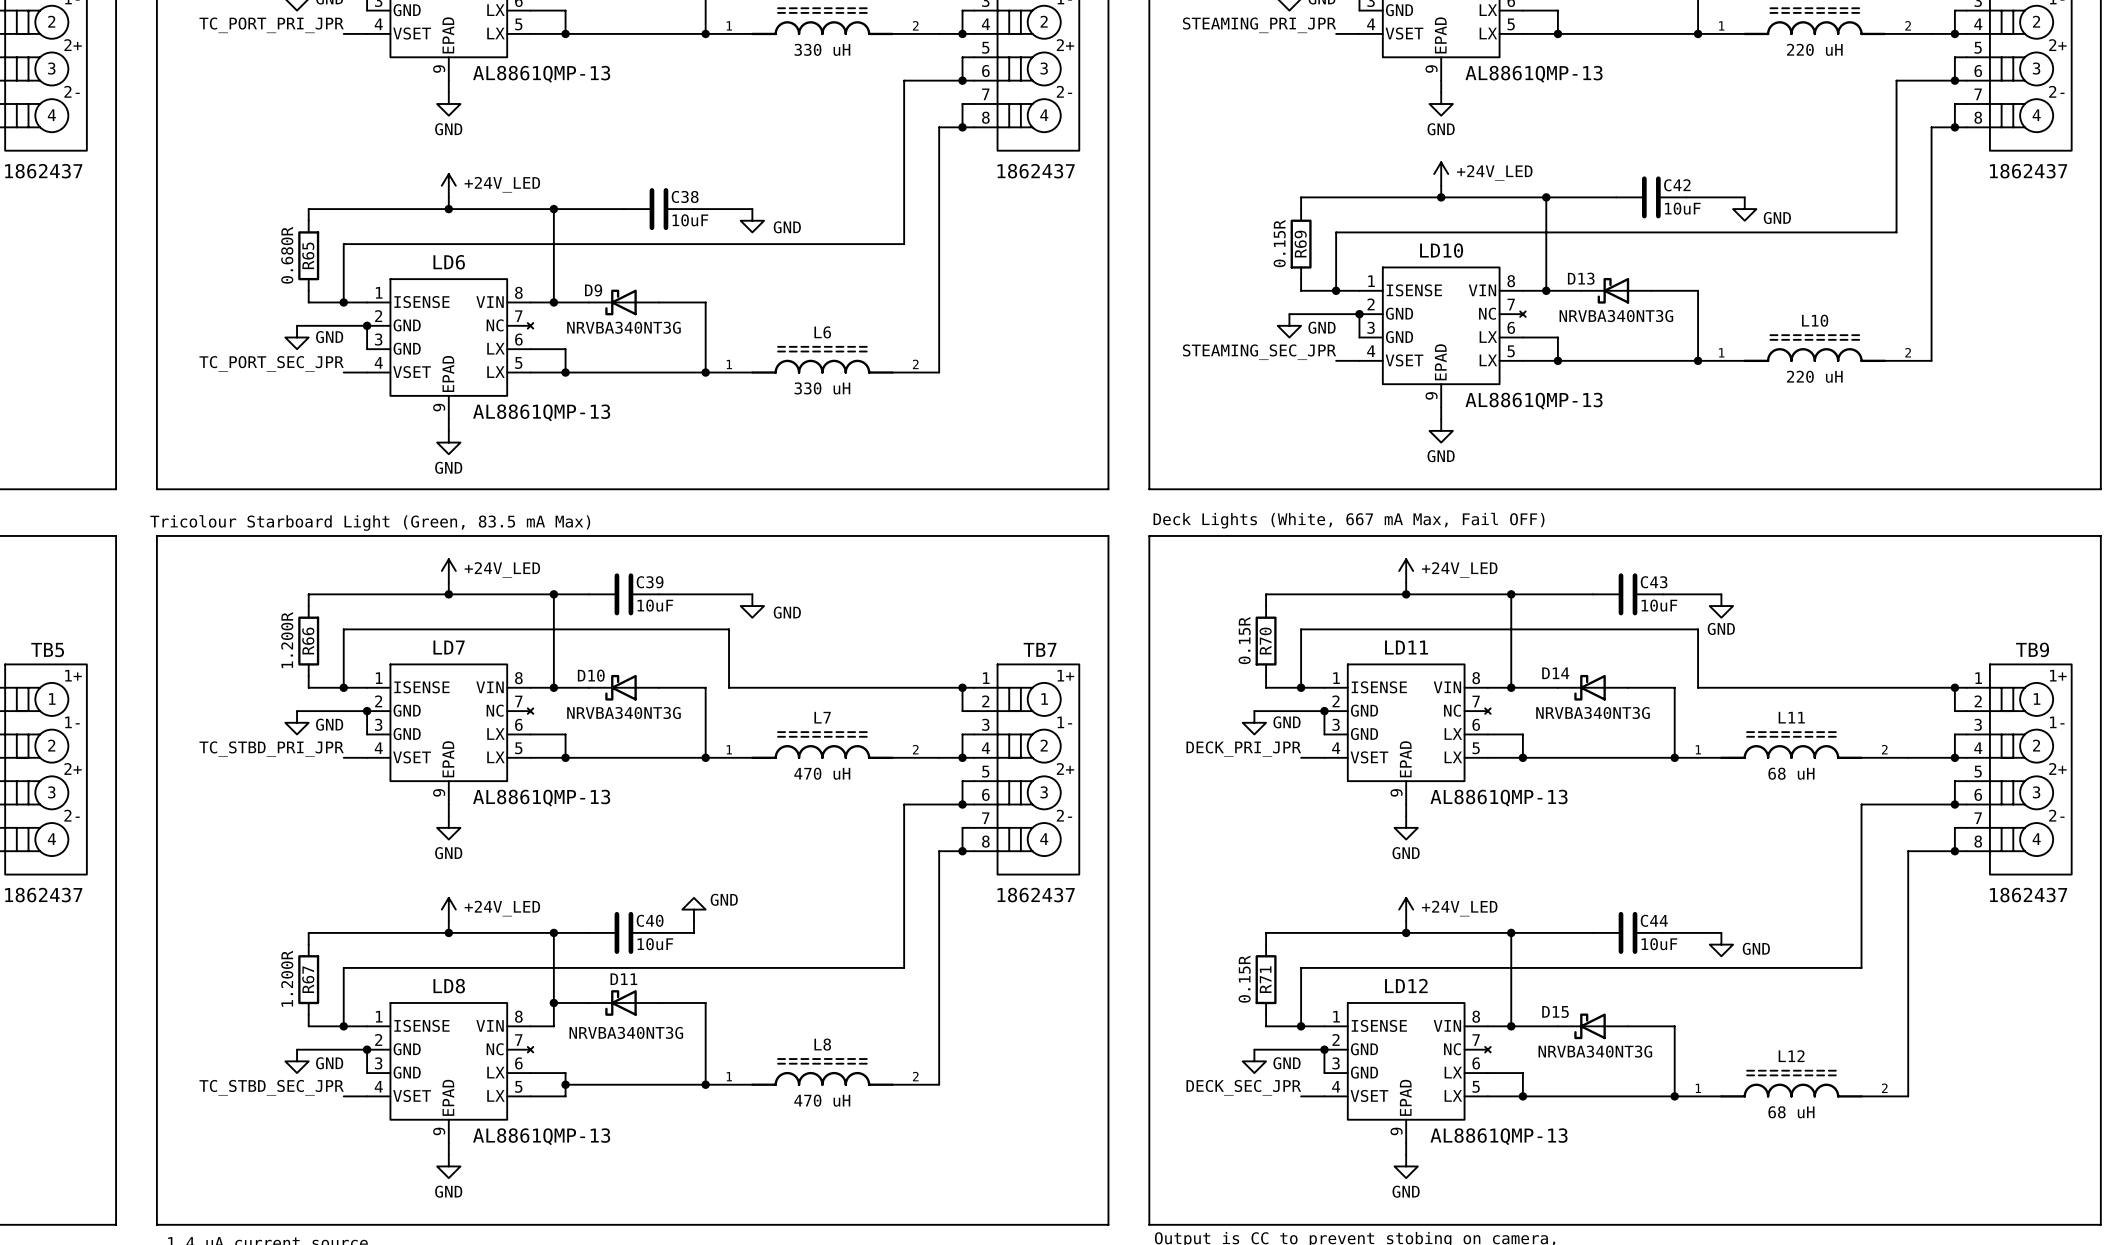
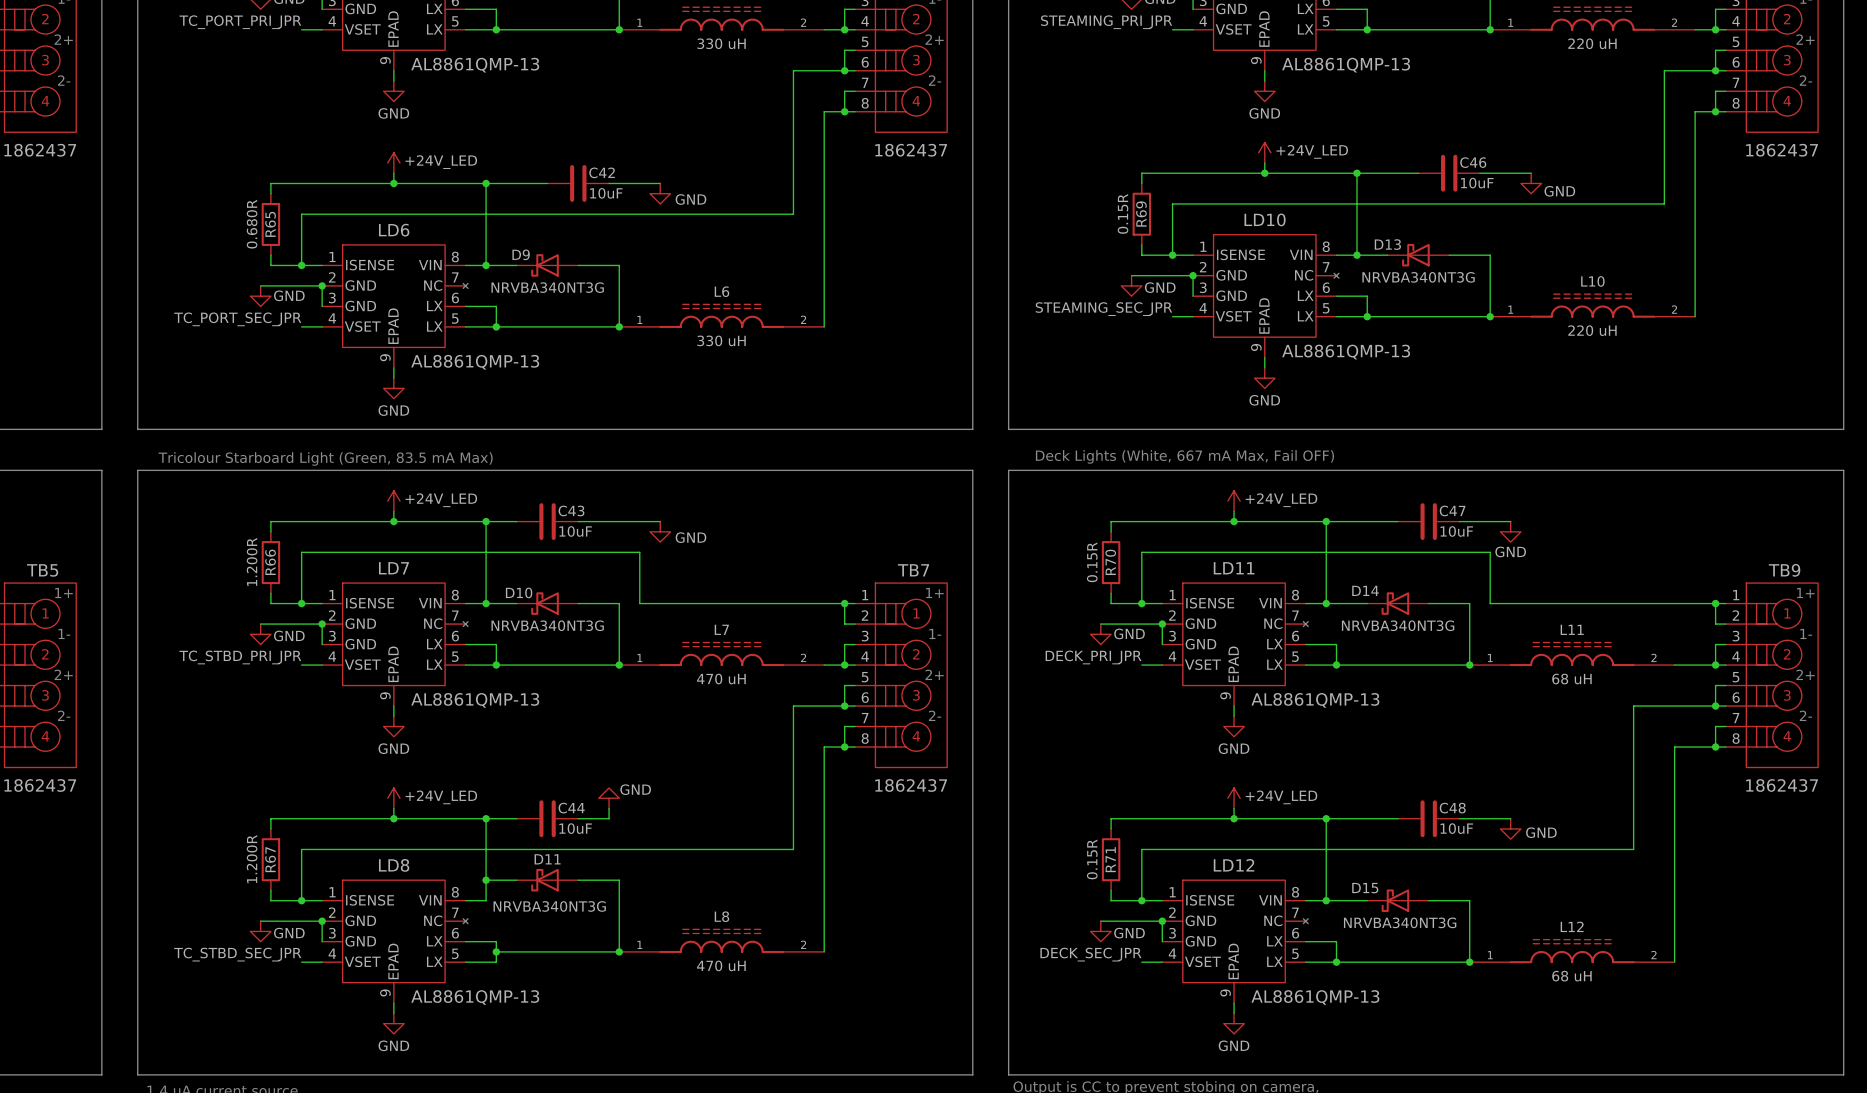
C42 name: C42 (1677, 185) -> C46 (1473, 162)
C38 name: C38 (685, 196) -> C42 (602, 172)
C39 name: C39 (650, 582) -> C43 (571, 510)
C43 name: C43 (1654, 582) -> C47 (1452, 510)
C40 name: C40 (650, 920) -> C44 (571, 808)
C44 name: C44 (1654, 920) -> C48 (1452, 808)

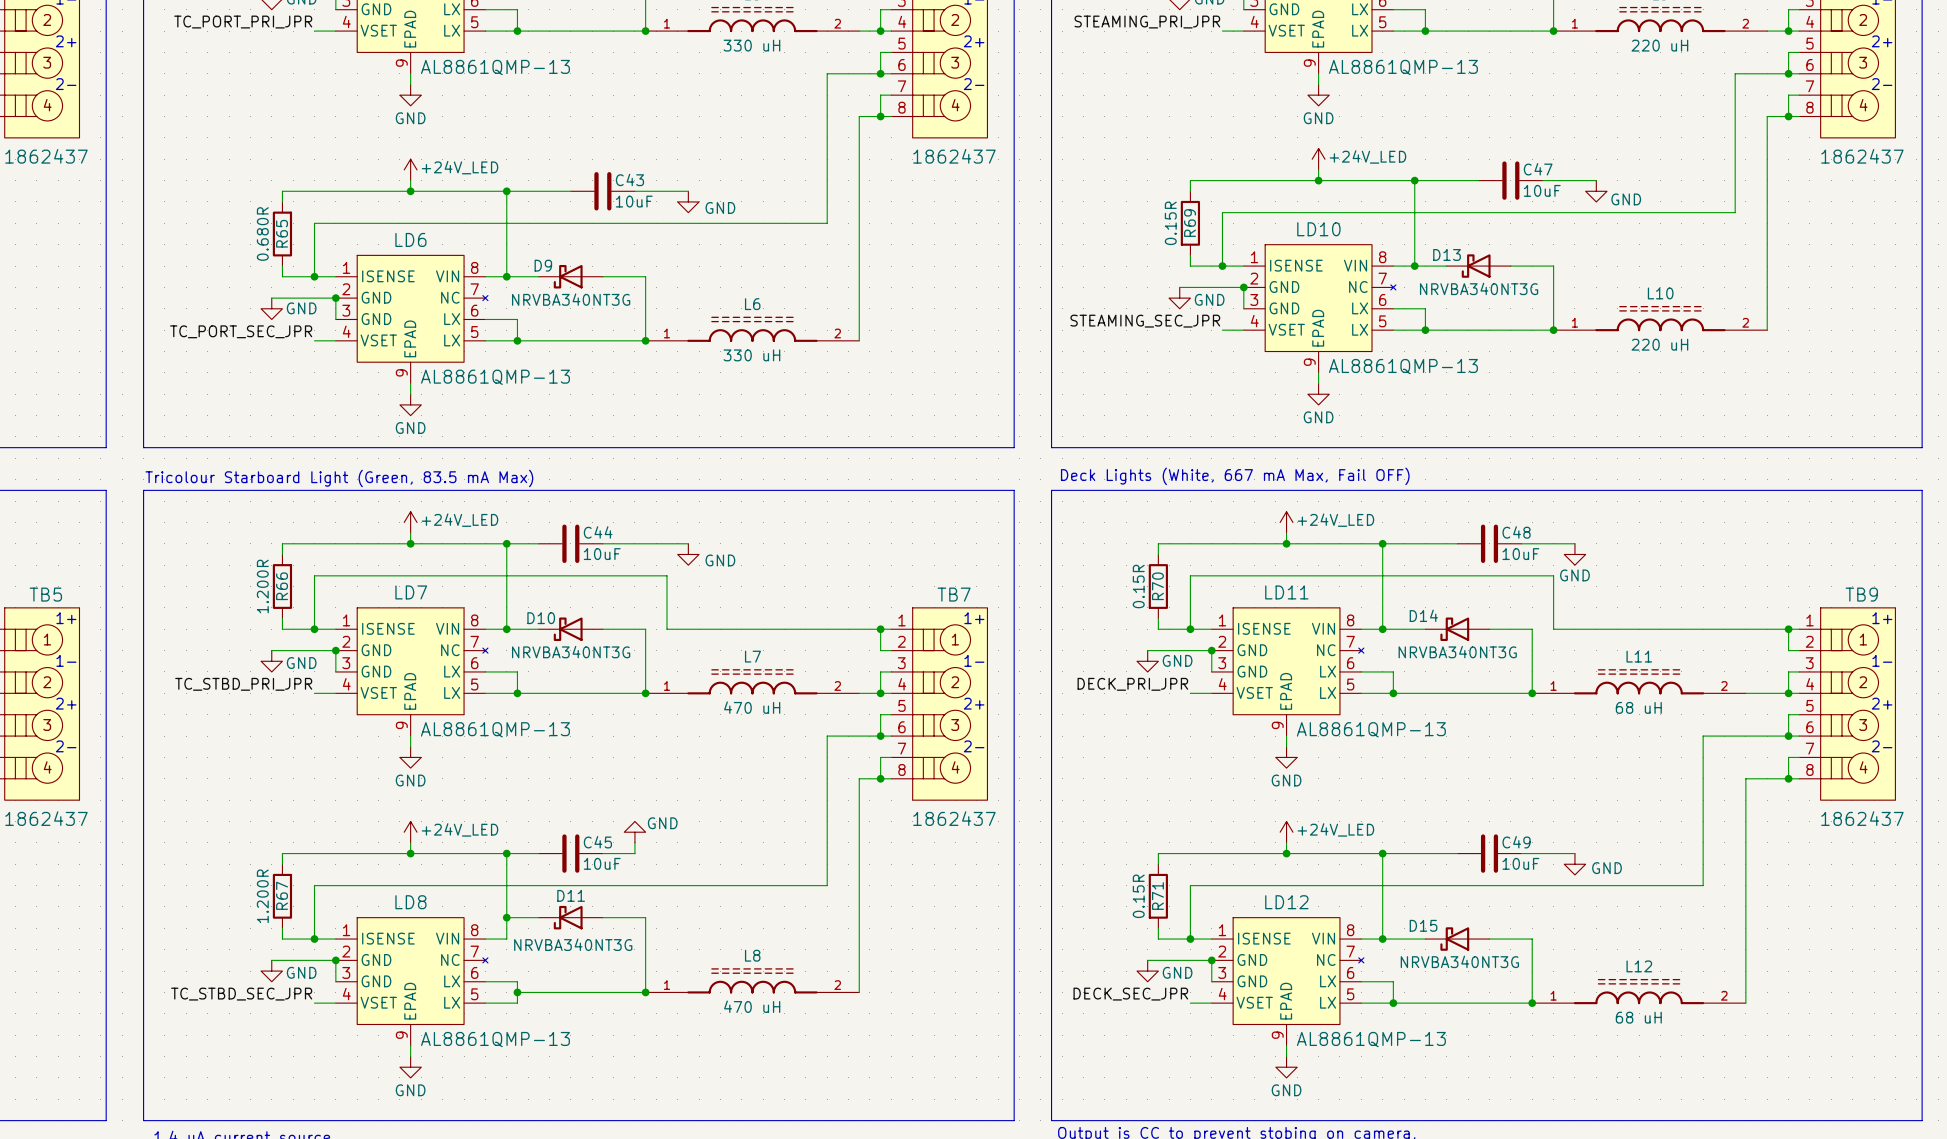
C46 name: C46 (1473, 162) -> C47 (1538, 169)
C42 name: C42 (602, 172) -> C43 (629, 179)
C43 name: C43 (571, 510) -> C44 (598, 532)
C47 name: C47 (1452, 510) -> C48 (1516, 532)
C44 name: C44 (571, 808) -> C45 (597, 842)
C48 name: C48 (1452, 808) -> C49 (1516, 842)

